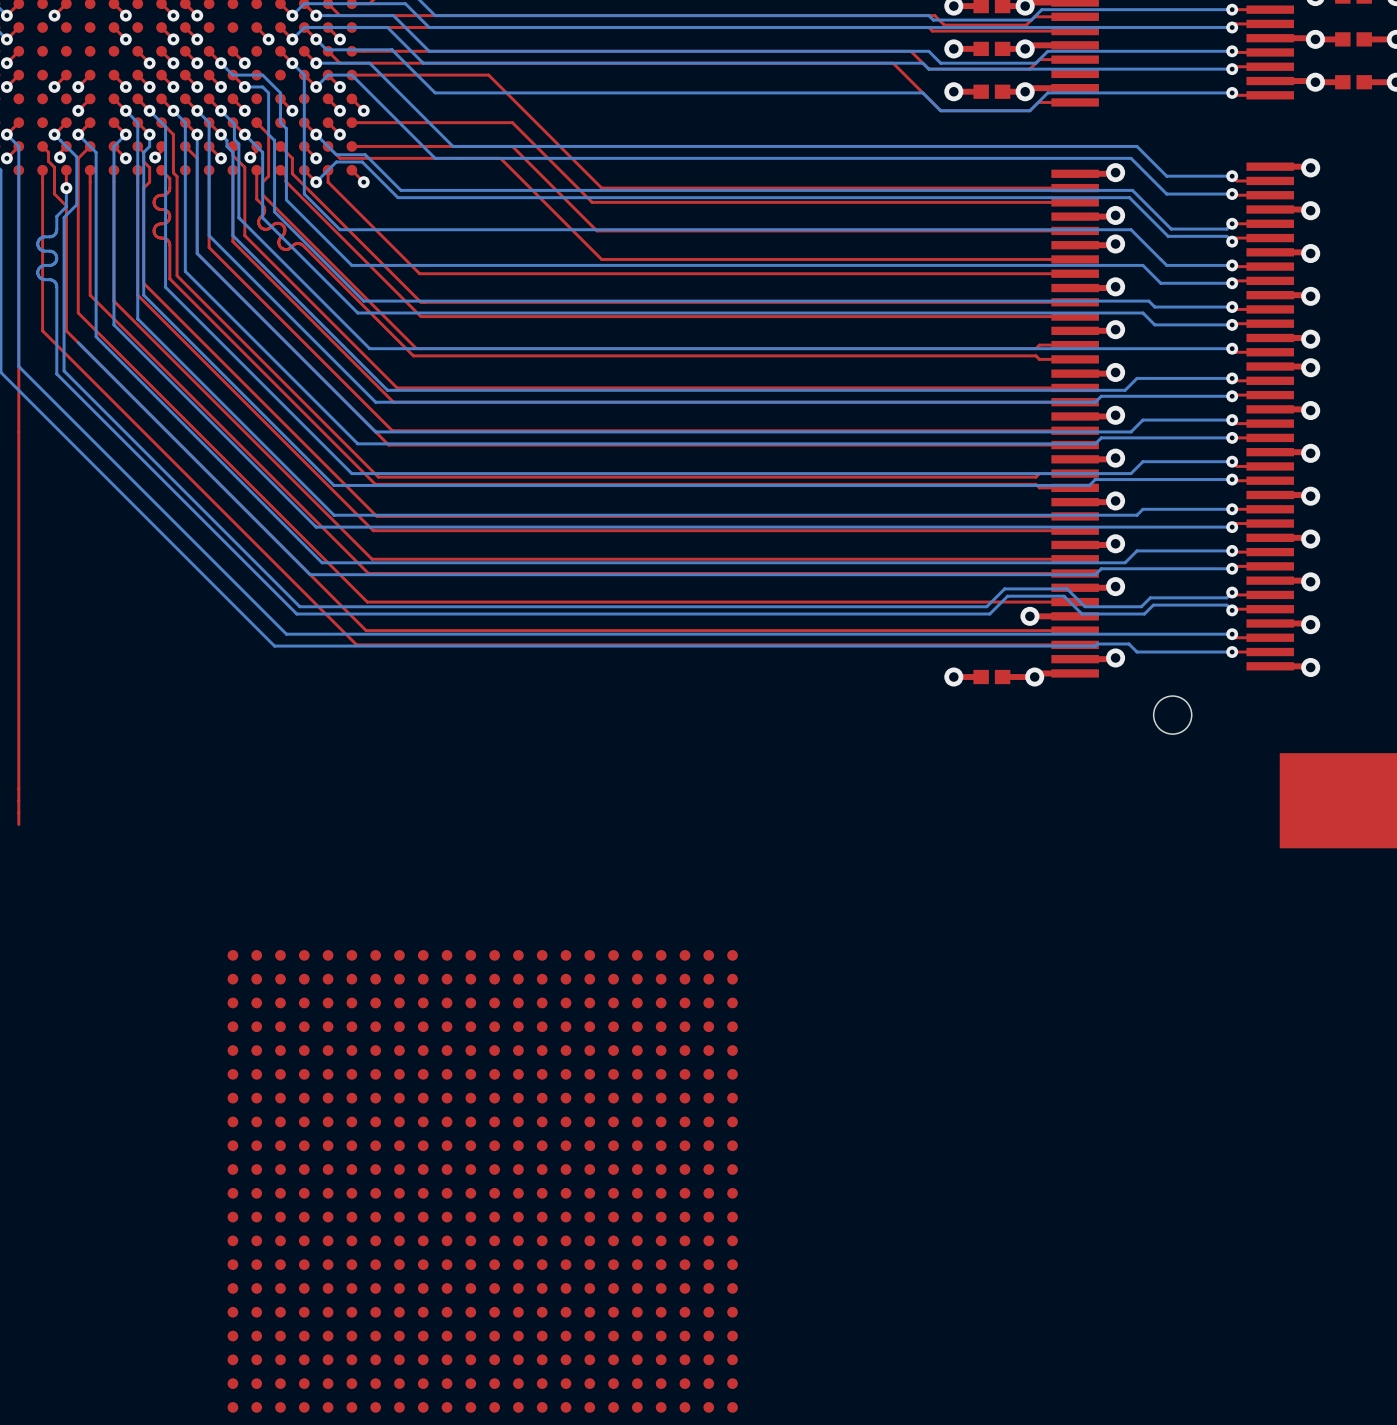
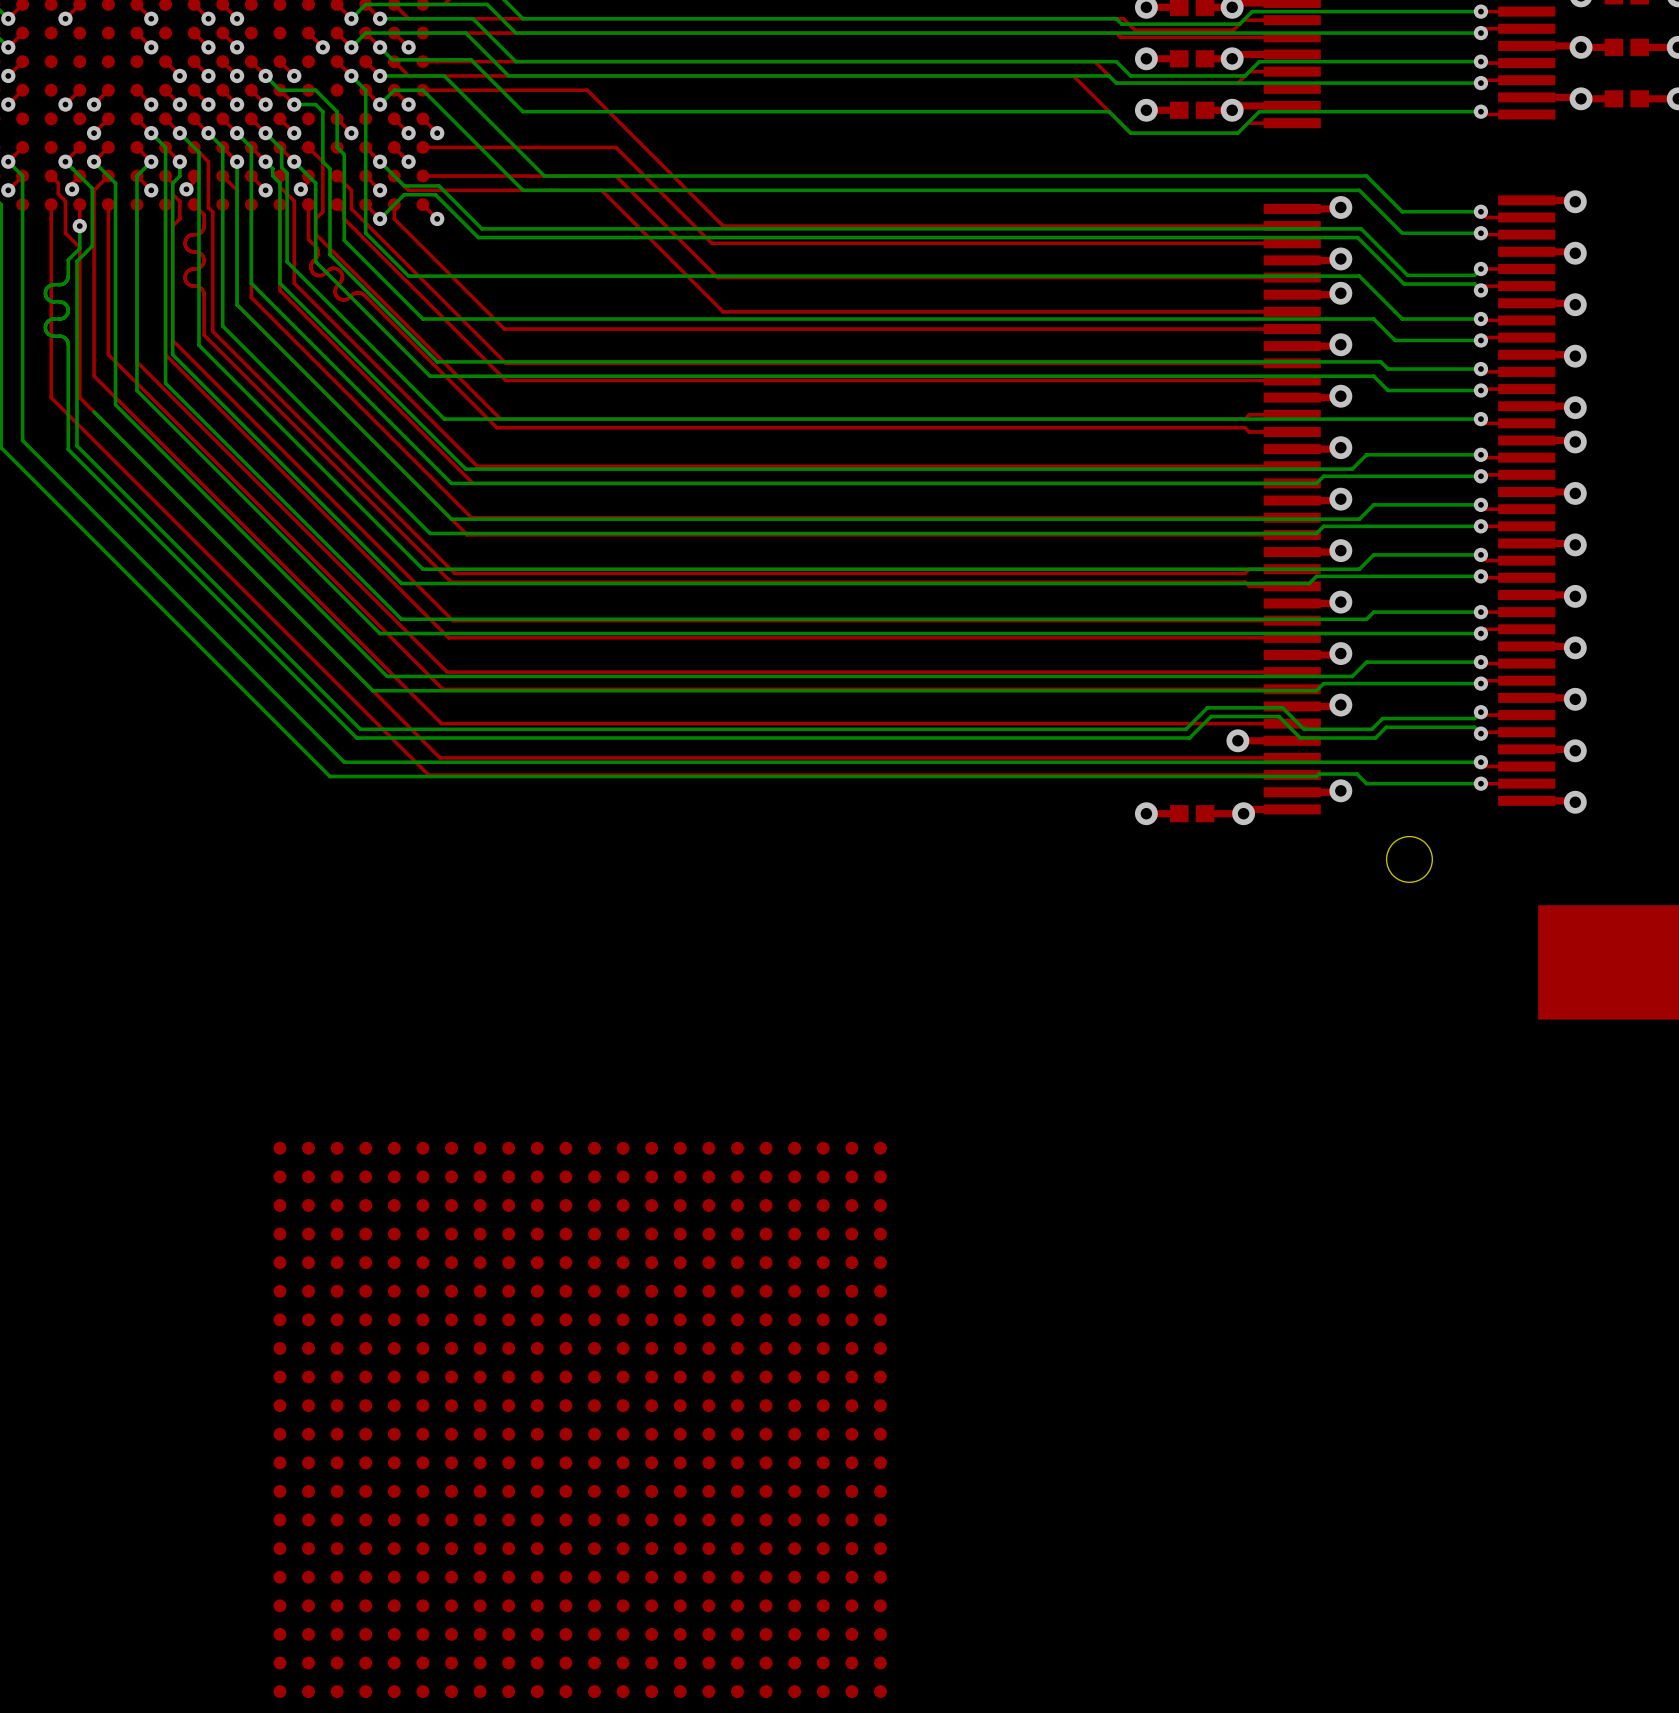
top track: (18, 170) (18, 824) -> none

